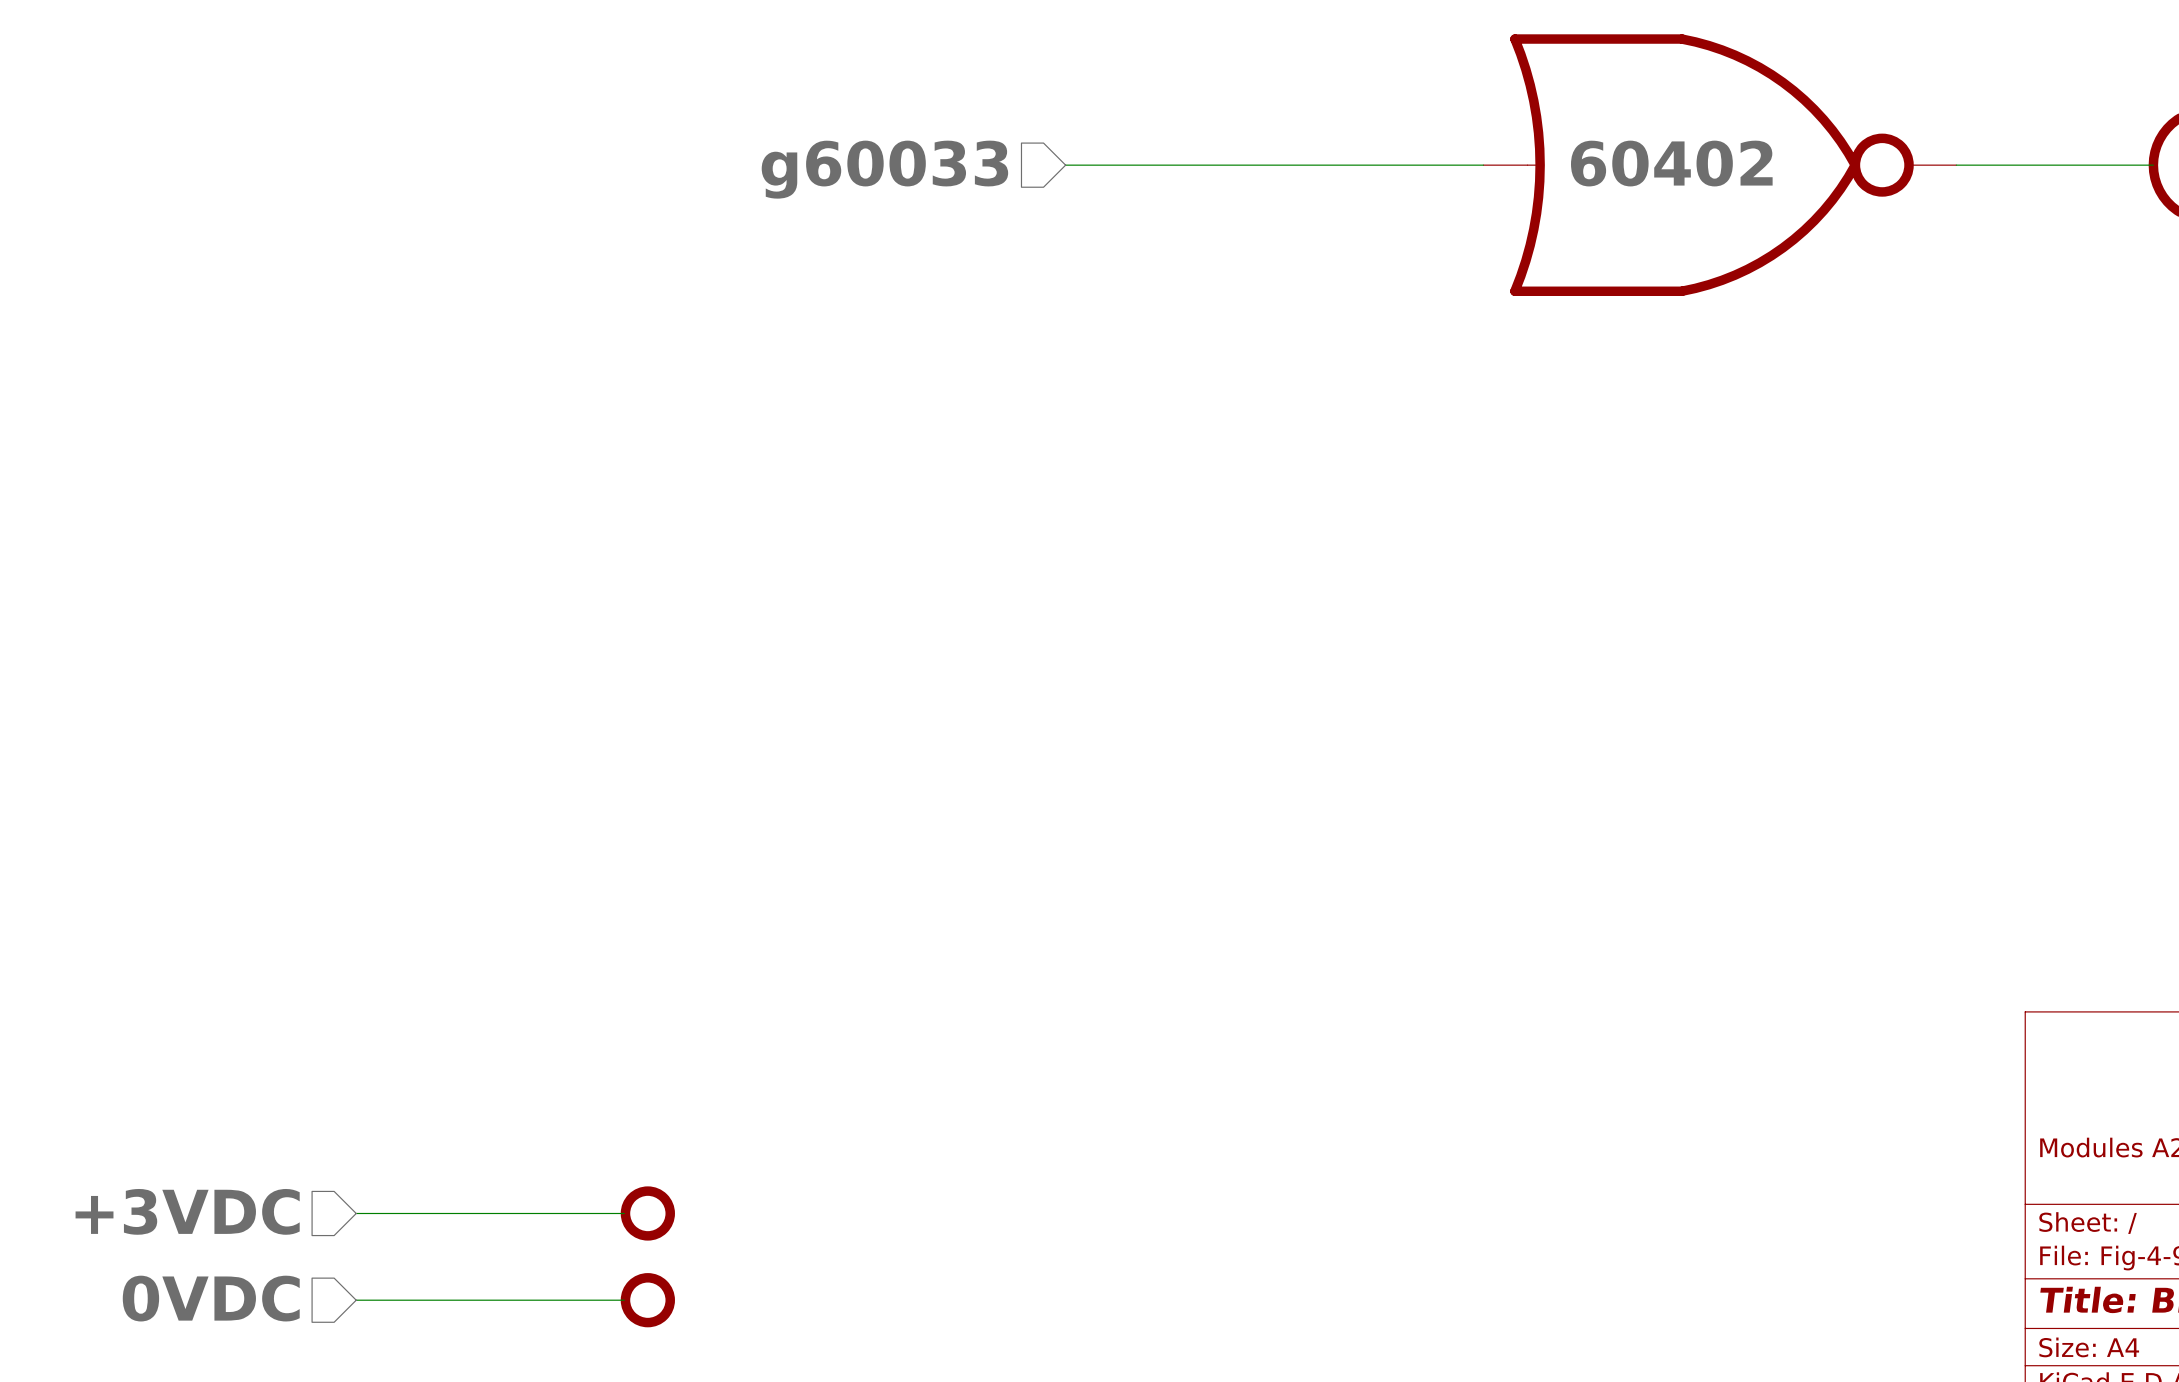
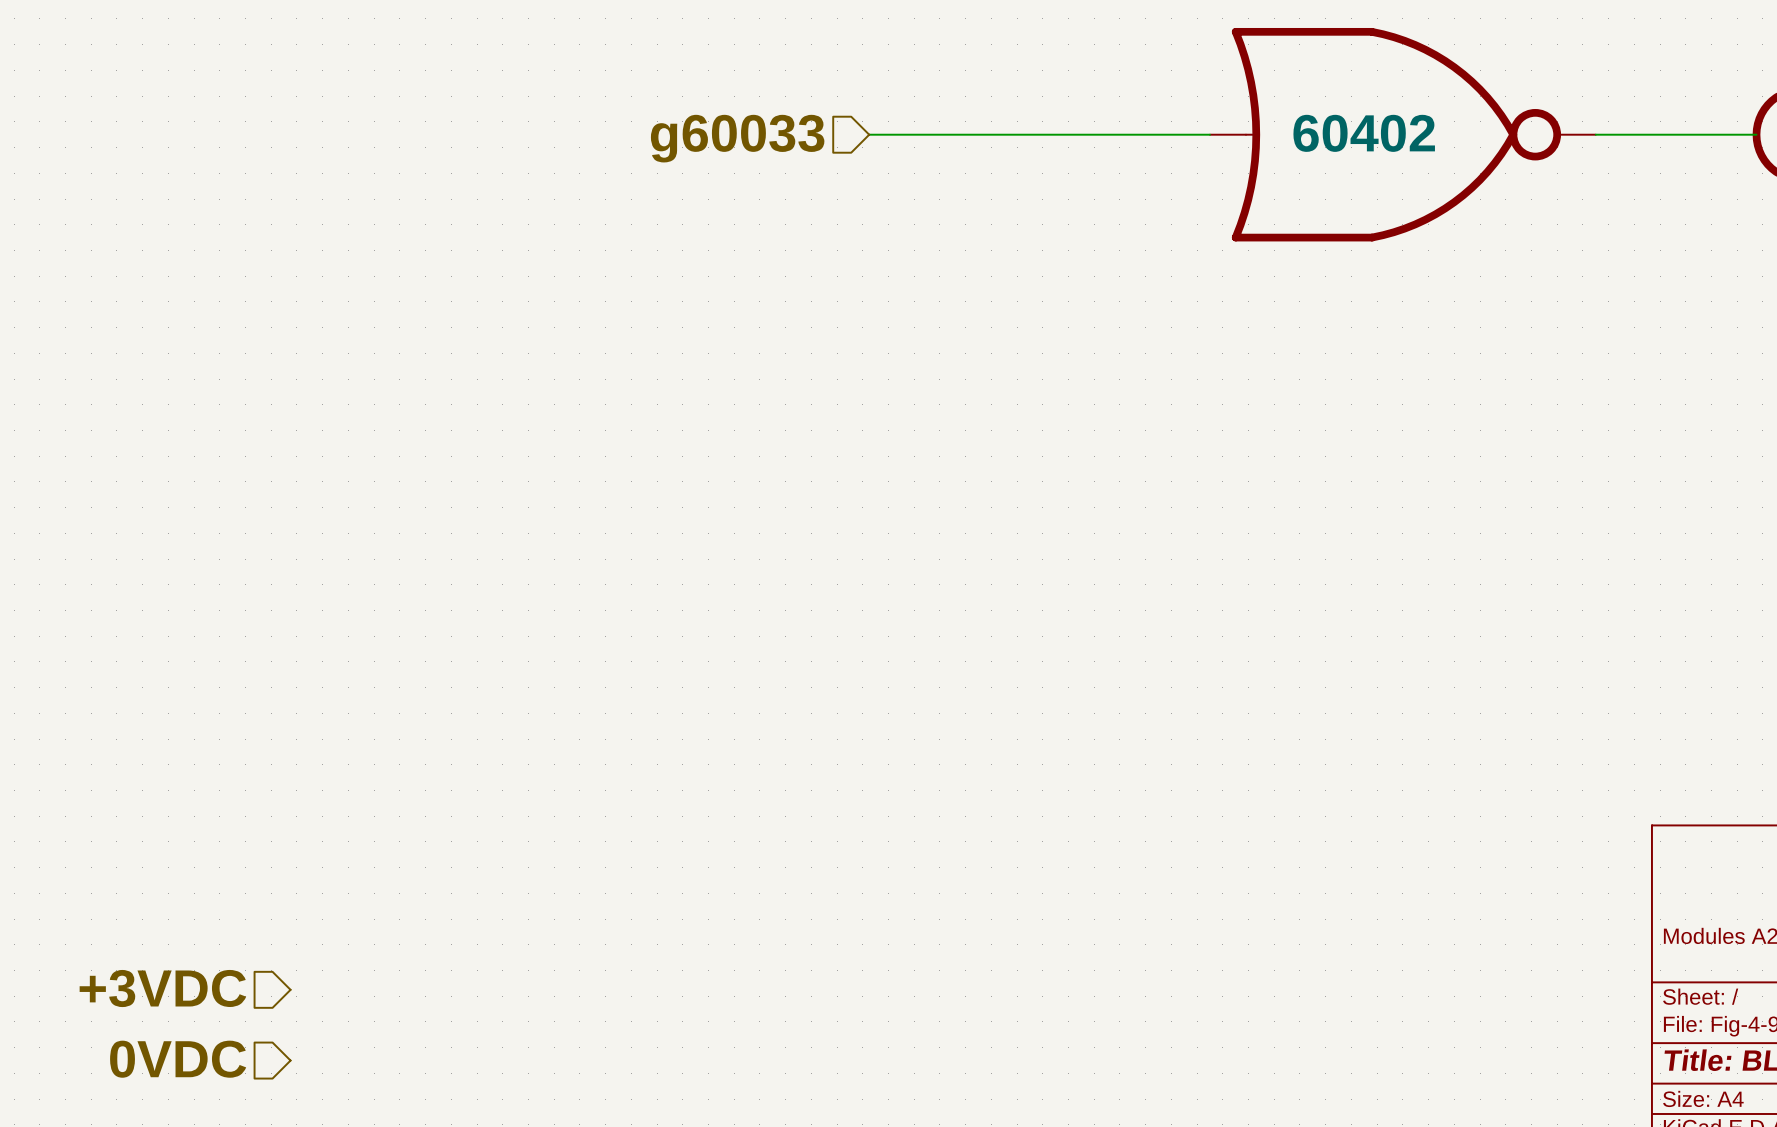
wire: (356, 1213) (624, 1213) -> none
part: (647, 1213) -> none
wire: (356, 1300) (624, 1300) -> none
part: (647, 1300) -> none

